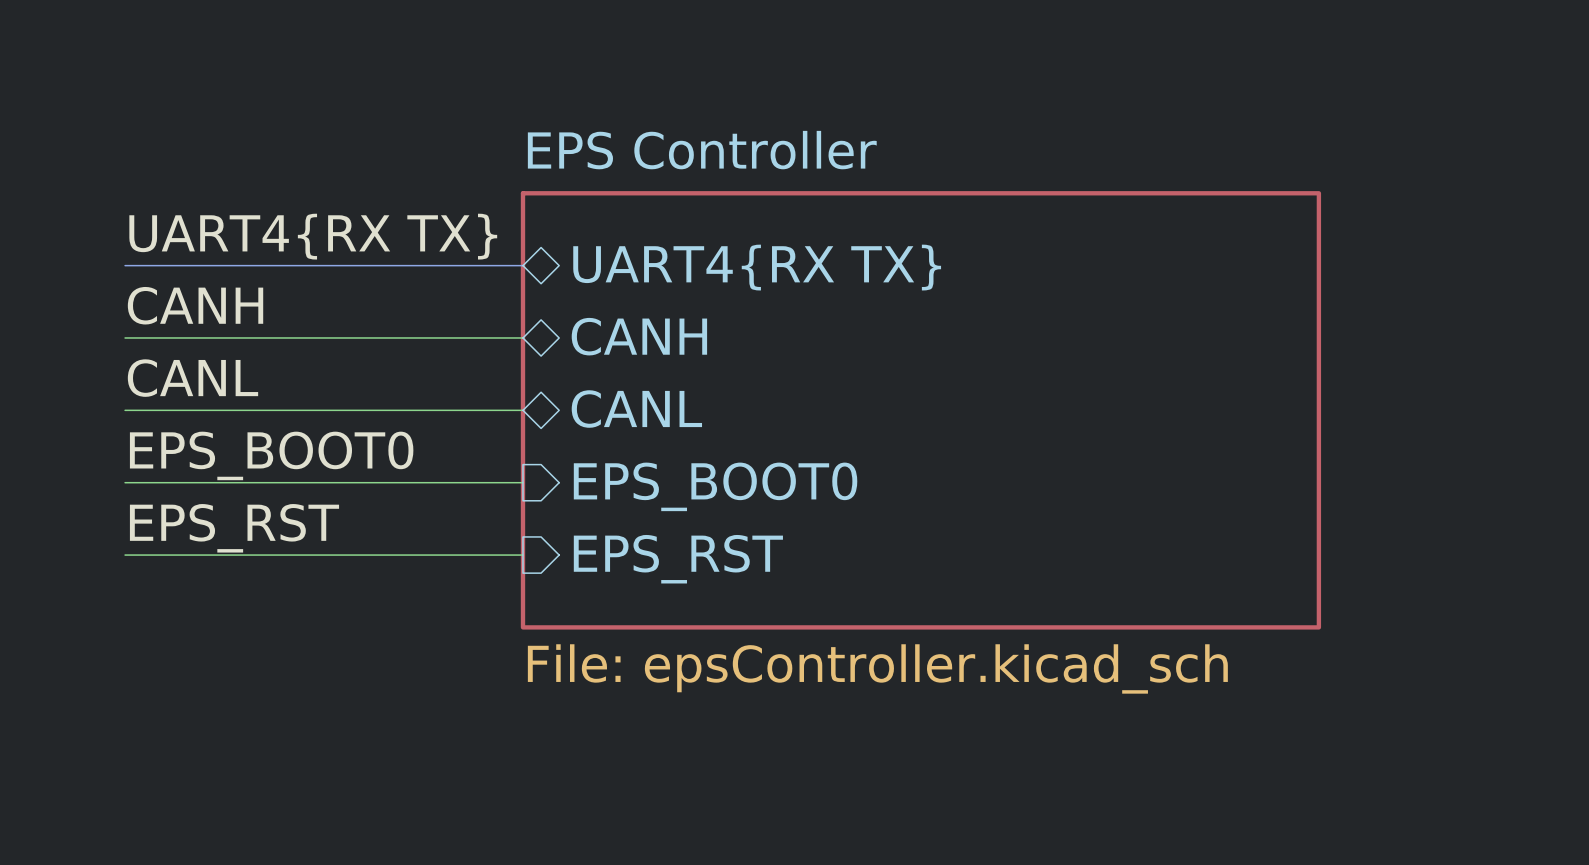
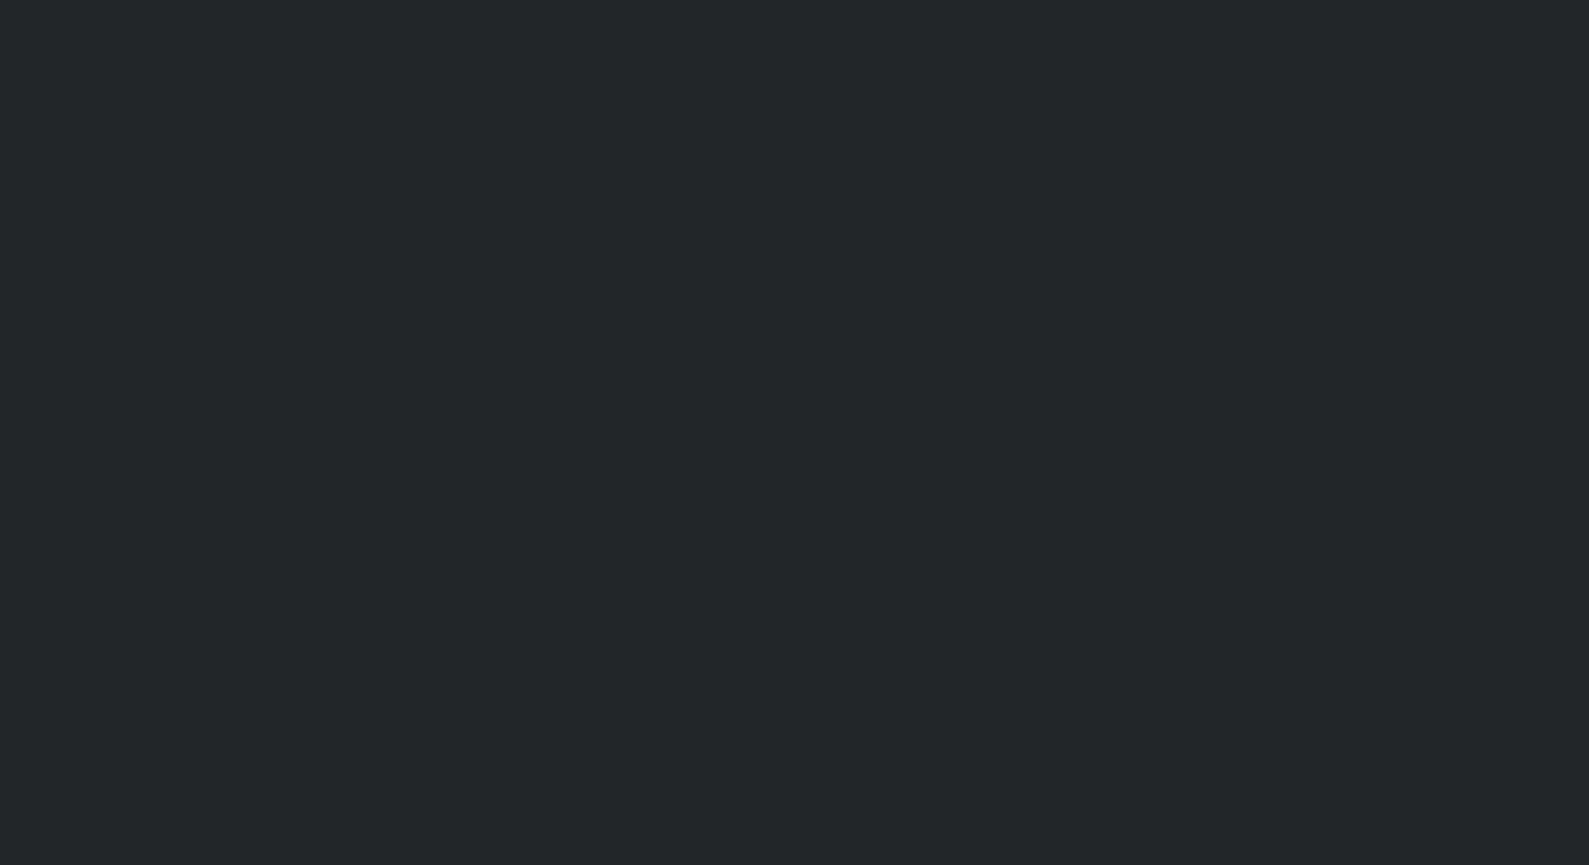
label: UART4{RX TX} (313, 236) -> none
bus: (125, 265) (522, 265) -> none
sheet pin: UART4{RX TX} (757, 267) -> none
label: CANH (195, 305) -> none
sheet pin: CANH (639, 336) -> none
wire: (125, 337) (522, 337) -> none
label: CANL (192, 378) -> none
sheet pin: CANL (636, 409) -> none
wire: (125, 410) (522, 410) -> none
sheet EPS Controller: File: epsController.kicad_sch (920, 410) -> none
label: EPS_BOOT0 (271, 455) -> none
wire: (125, 482) (522, 482) -> none
sheet pin: EPS_BOOT0 (715, 486) -> none
label: EPS_RST (234, 528) -> none
wire: (125, 555) (522, 555) -> none
sheet pin: EPS_RST (678, 559) -> none

